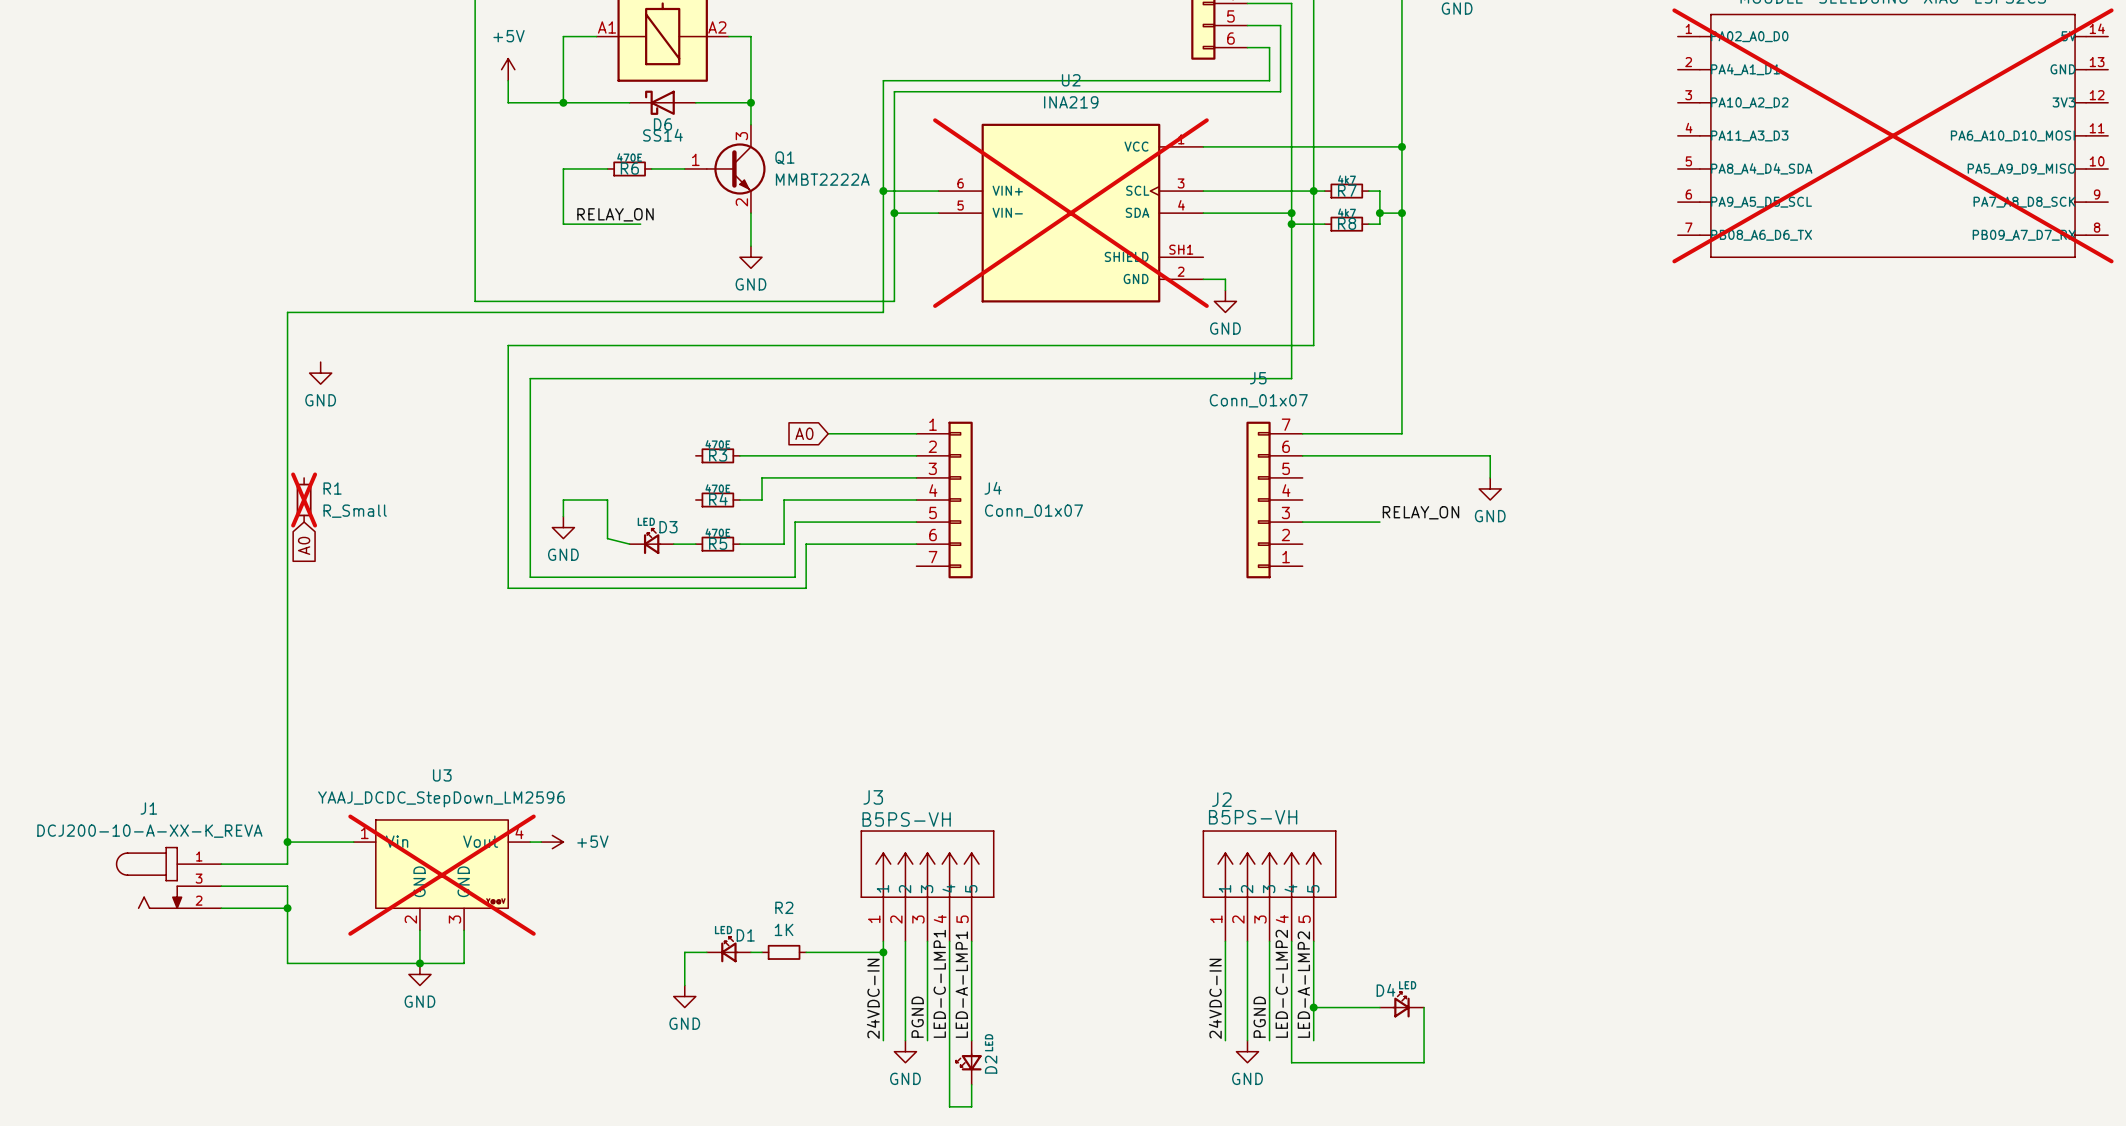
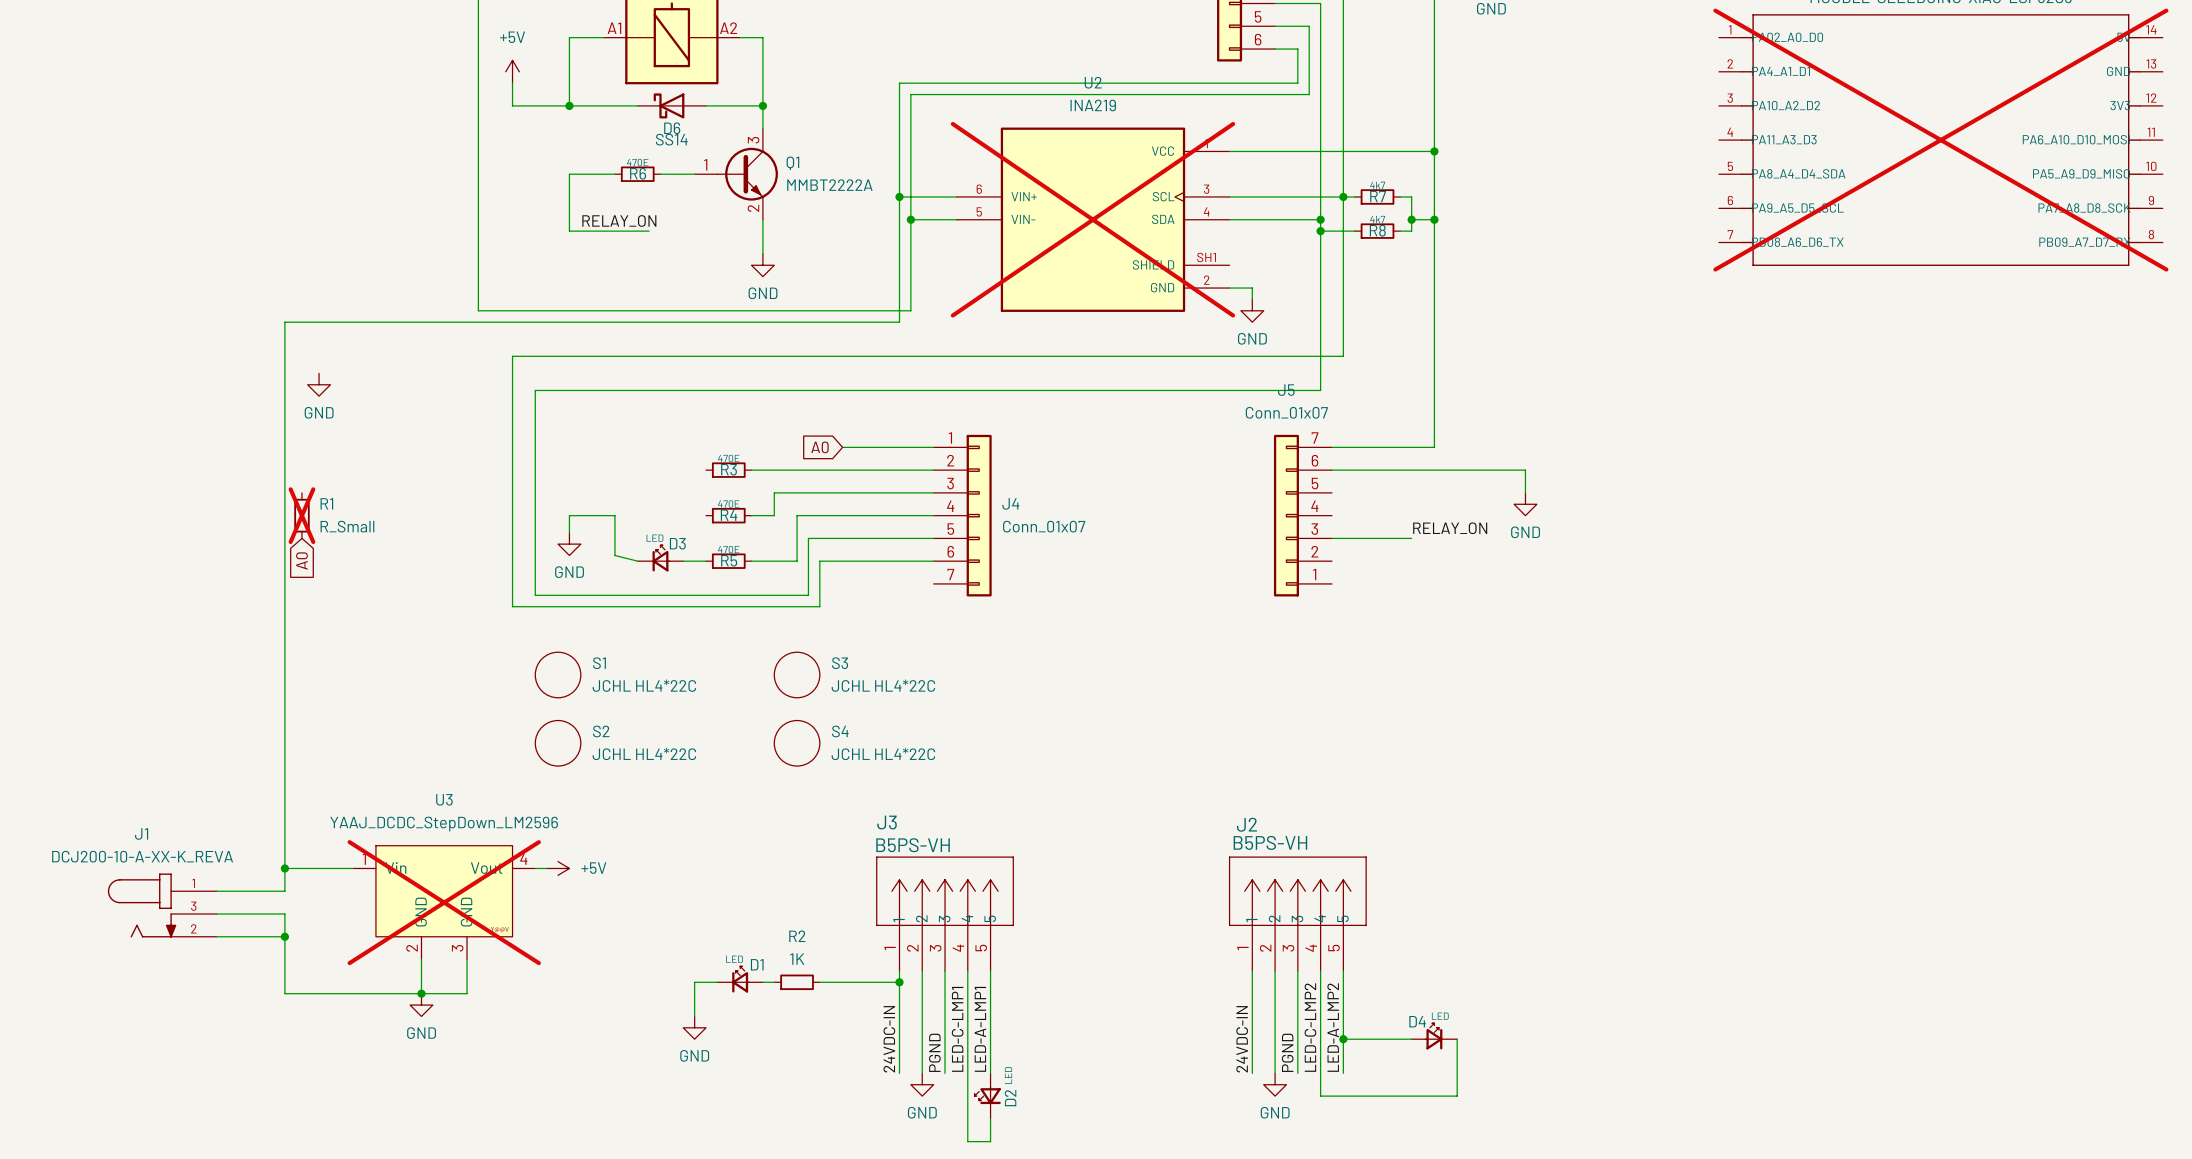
S1: none -> JCHL HL4*22C (558, 674)
S3: none -> JCHL HL4*22C (797, 674)
S2: none -> JCHL HL4*22C (558, 743)
S4: none -> JCHL HL4*22C (797, 743)

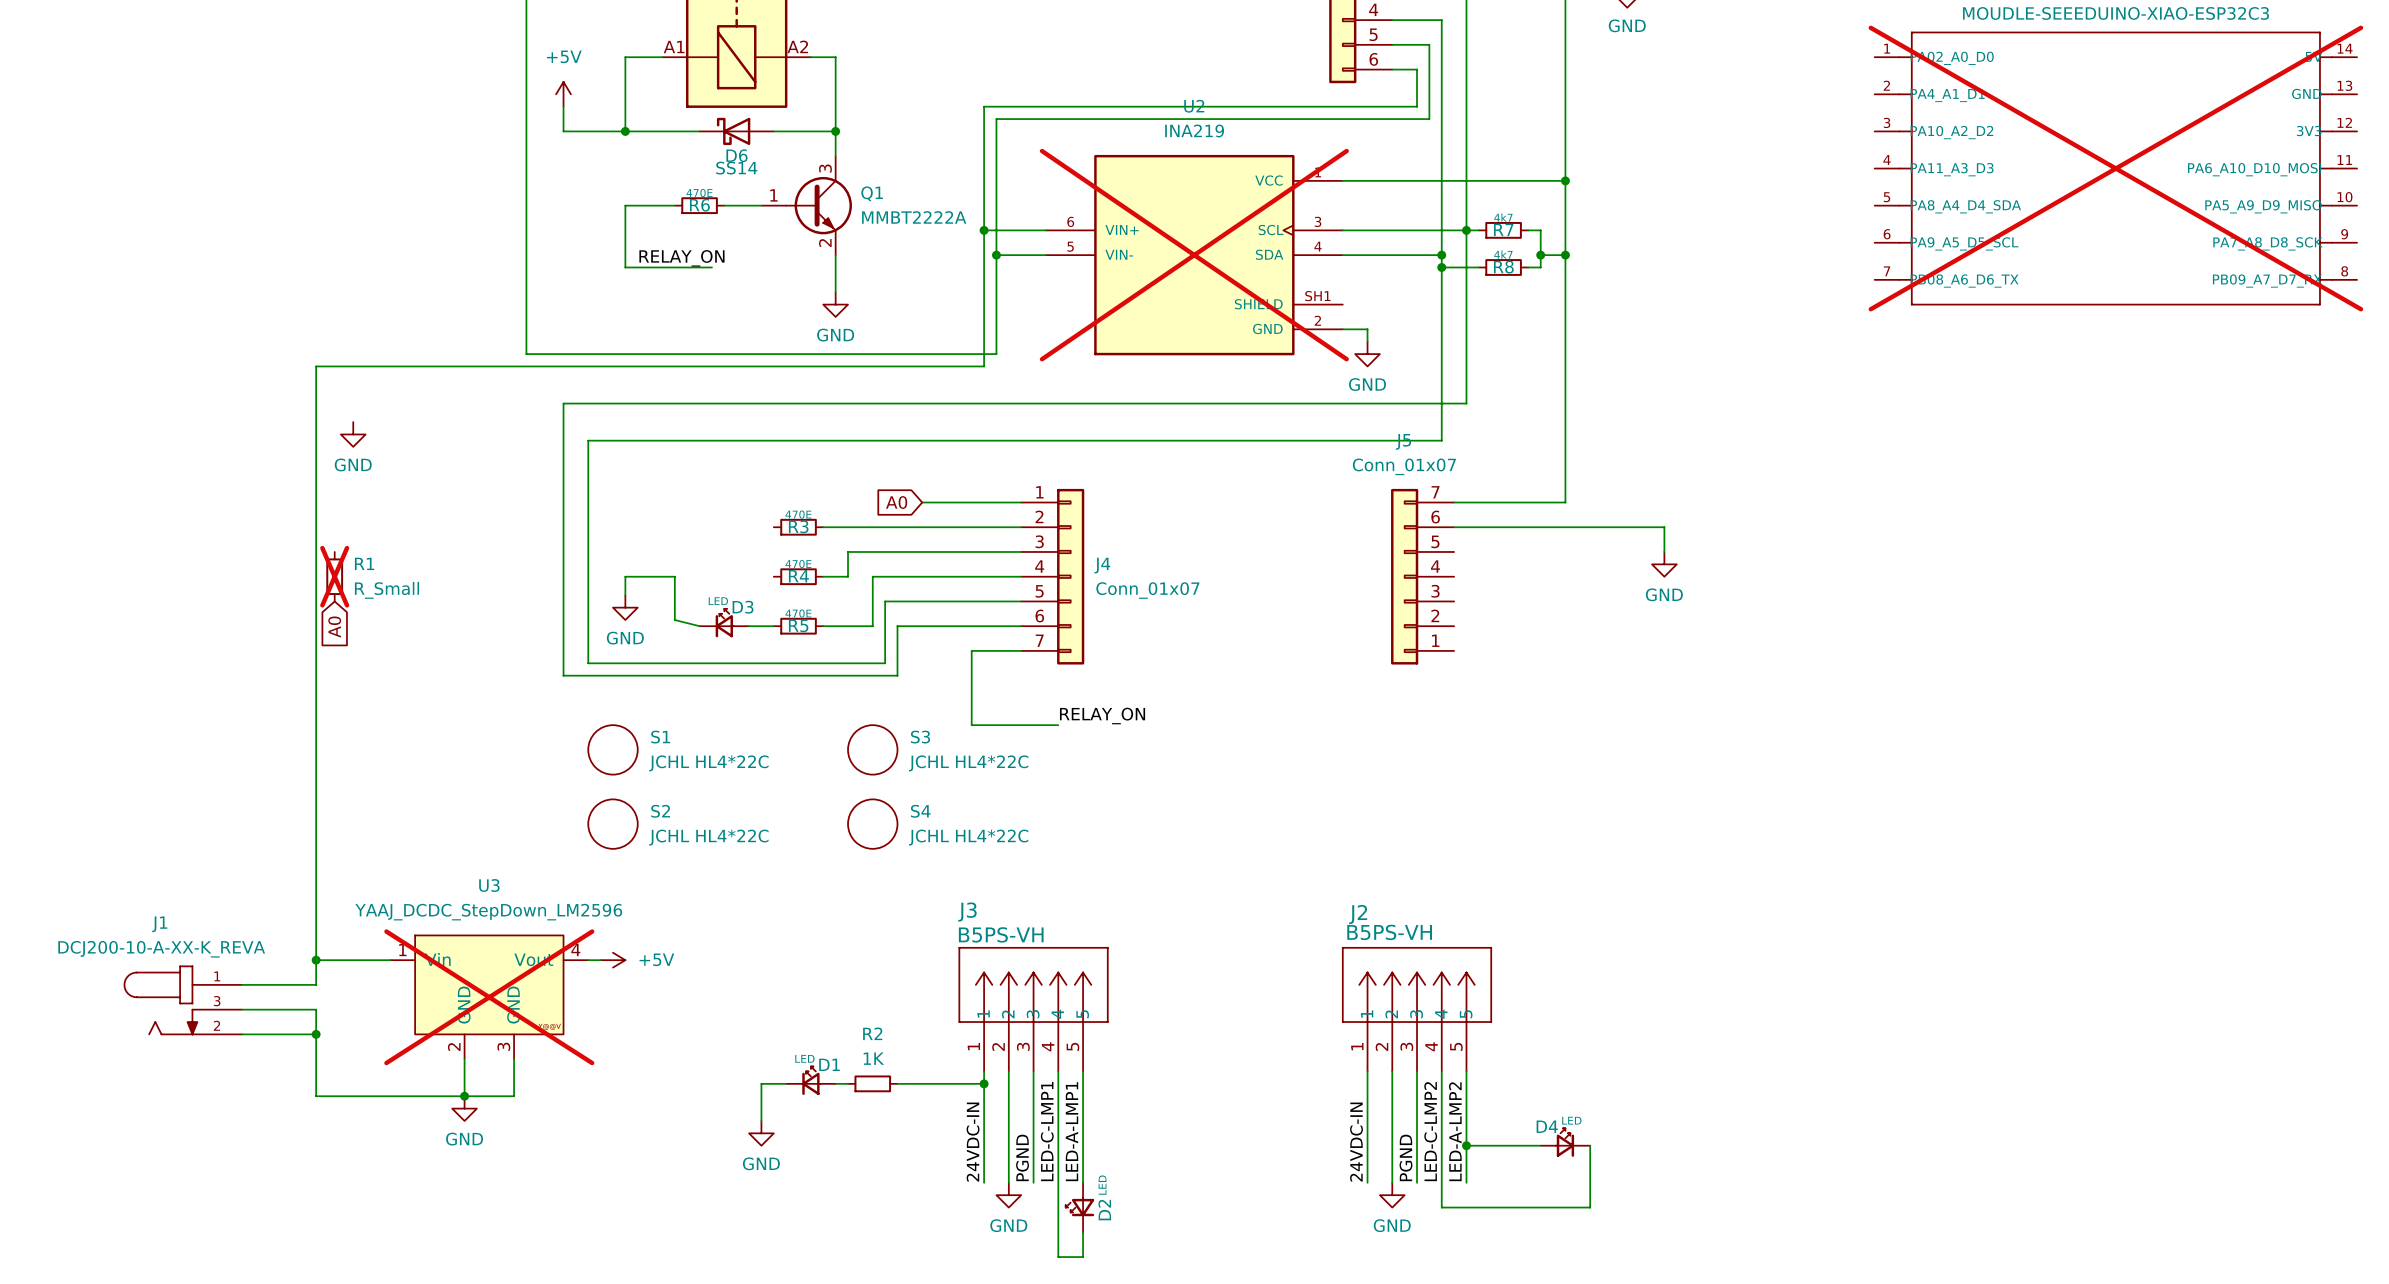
label: RELAY_ON (1450, 528) -> none
wire: (1331, 538) (1411, 538) -> none
wire: none -> (1021, 650) (971, 650) (971, 725) (1058, 725)
label: none -> RELAY_ON (1102, 716)

